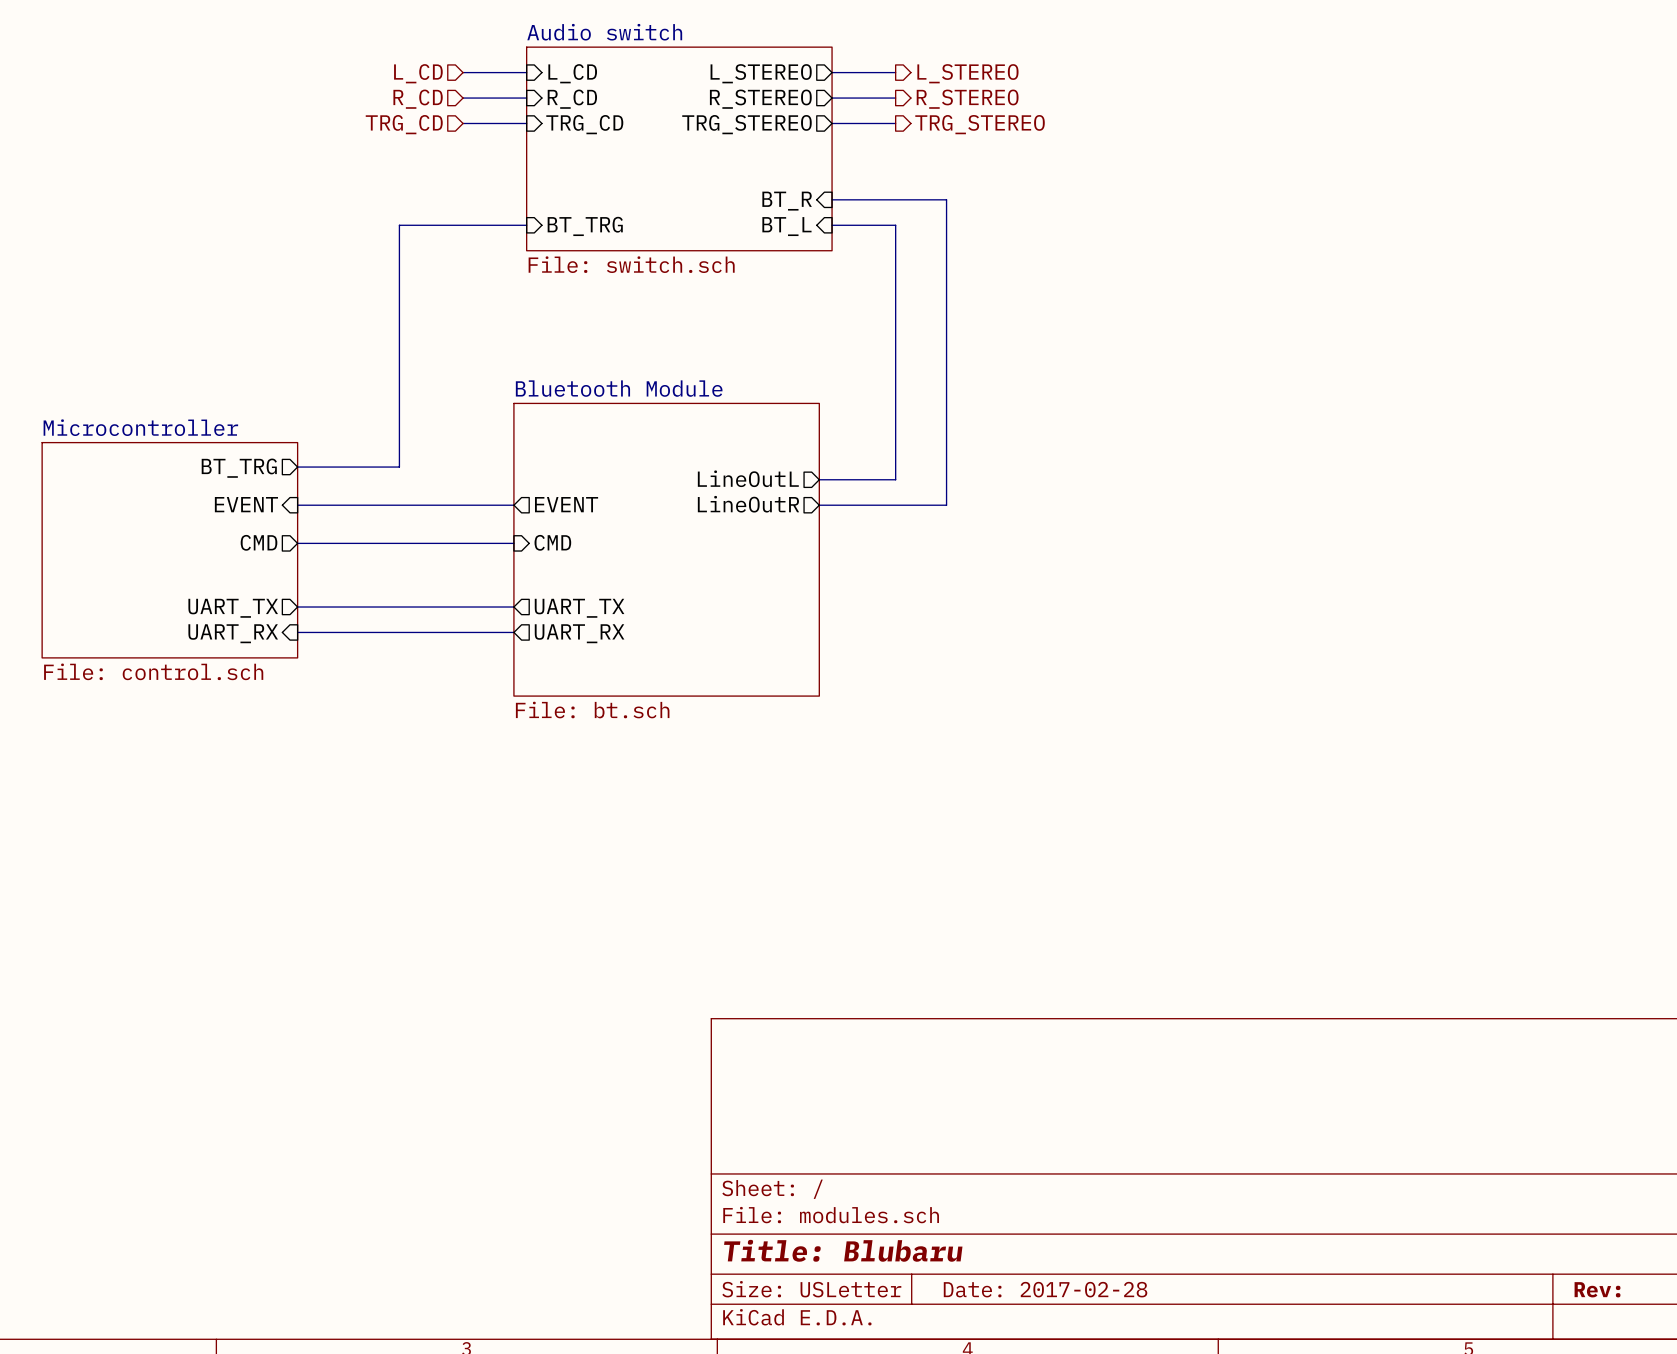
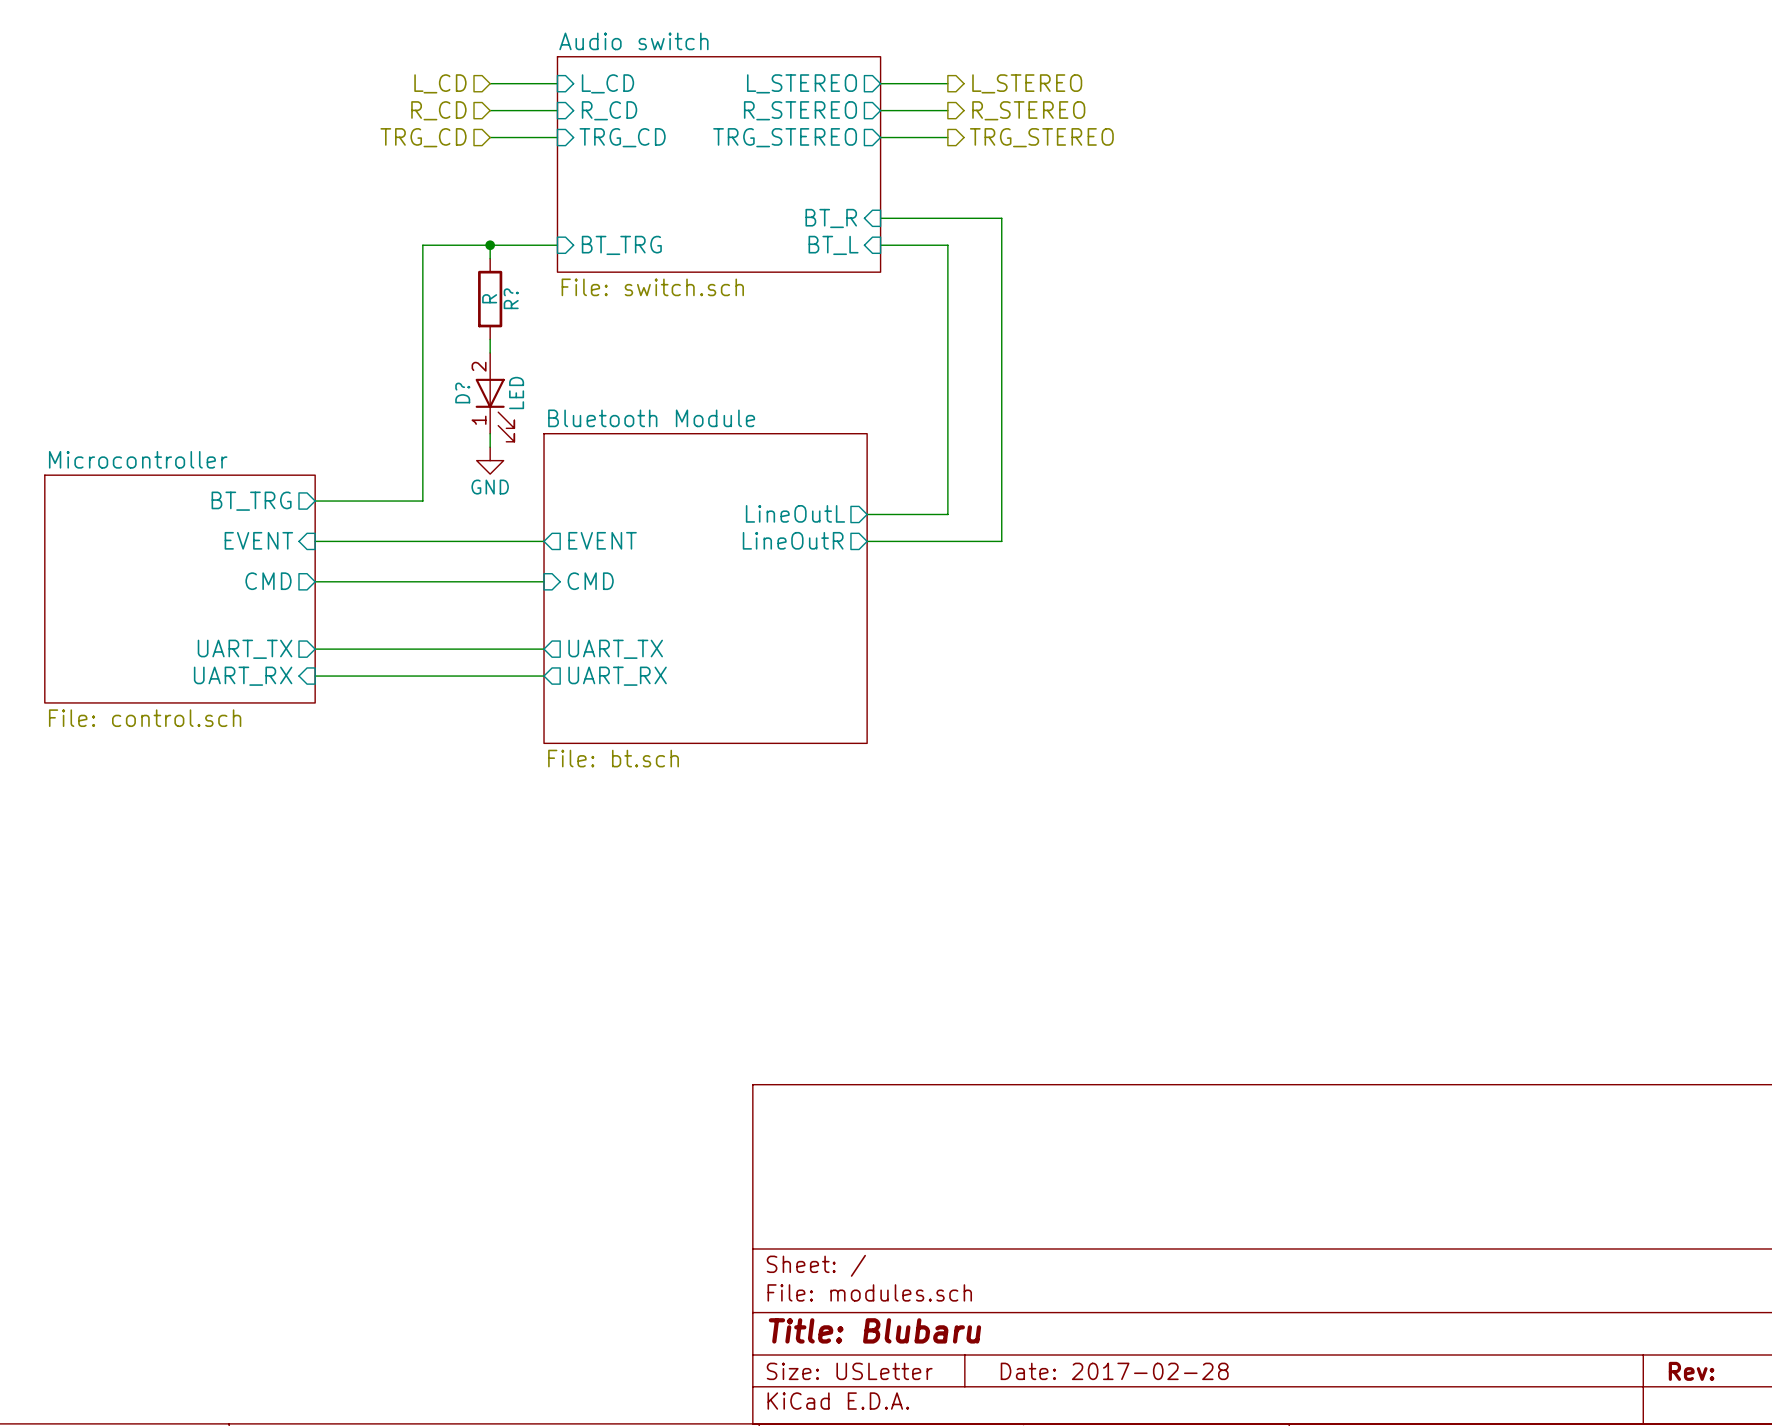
wire: none -> (490, 245) (490, 258)
junction: none -> (490, 245)
R?: none -> R (490, 299)
wire: none -> (490, 339) (490, 352)
D?: none -> LED (495, 397)
wire: none -> (490, 433) (490, 447)
power symbol: none -> GND (490, 460)

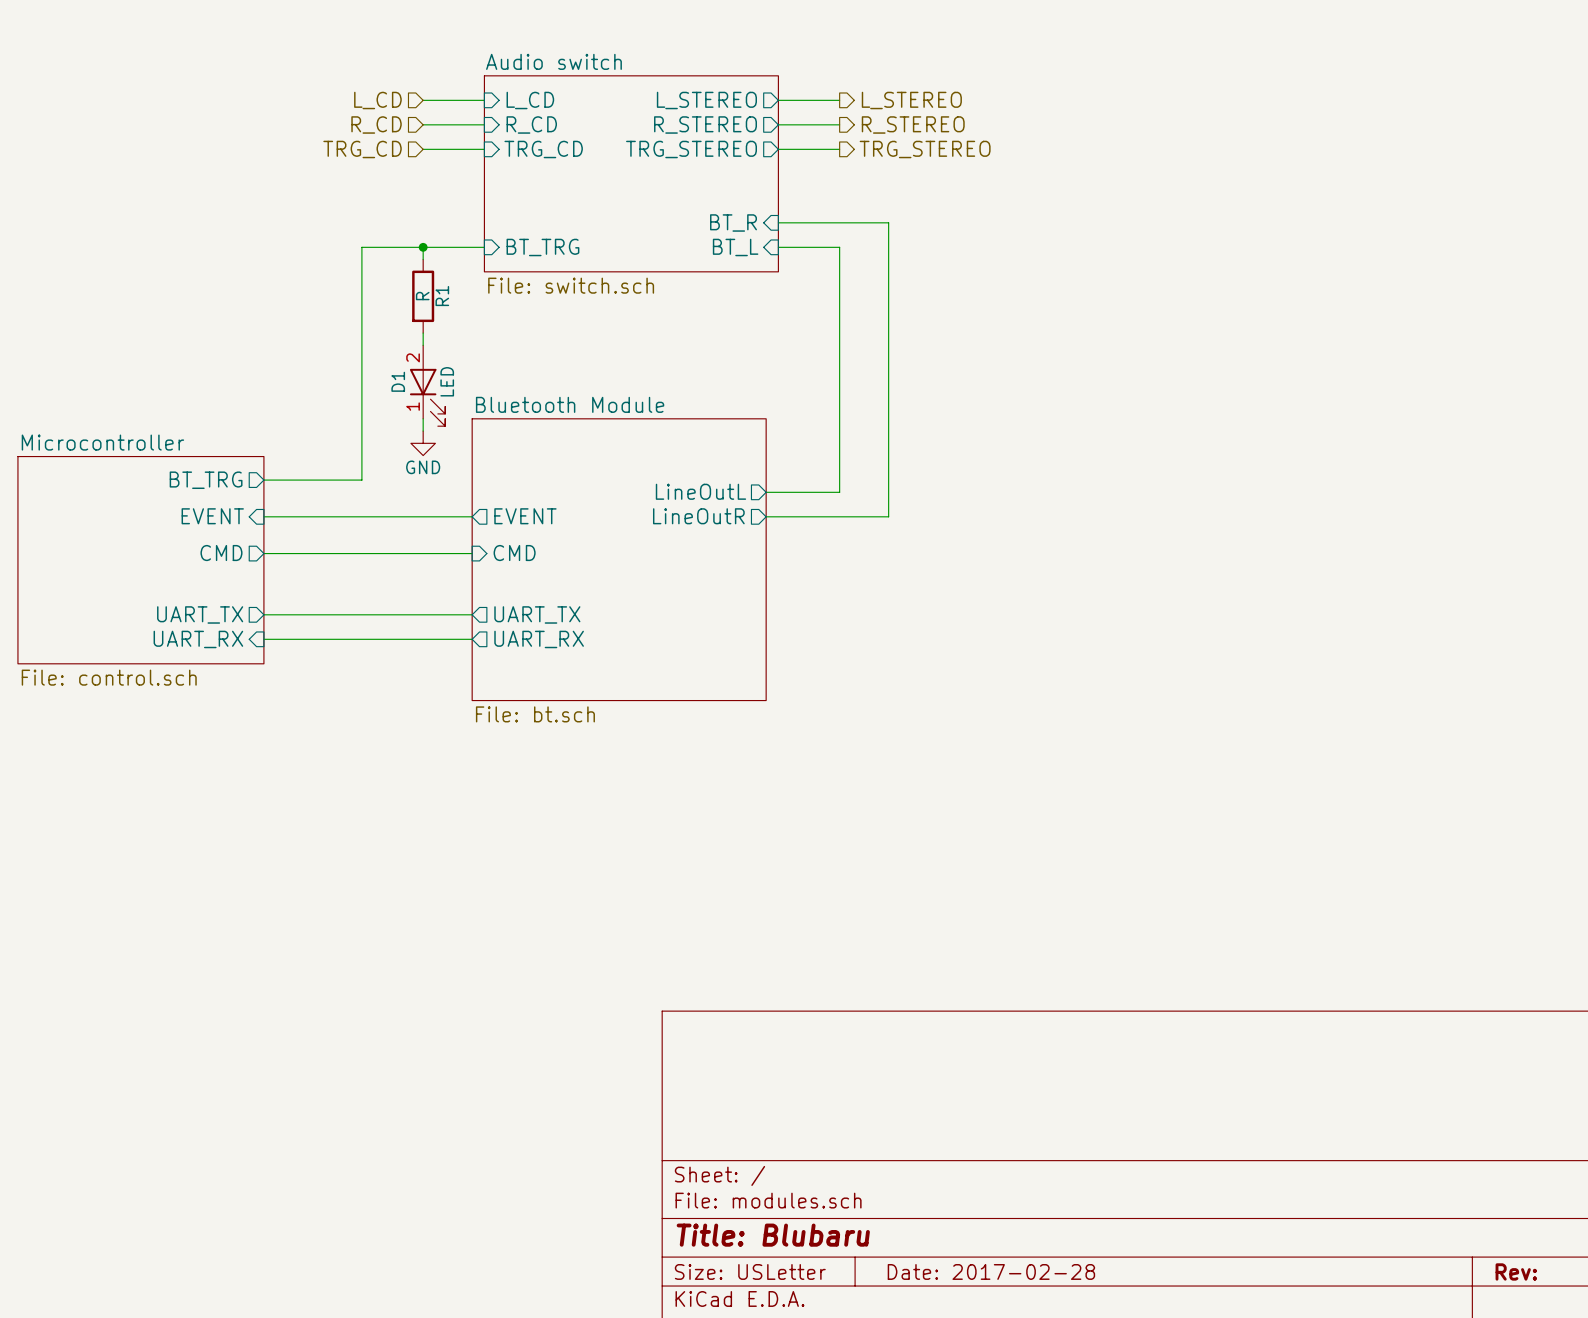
R? name: R? (511, 298) -> R1 (442, 296)
D? name: D? (462, 393) -> D1 (398, 381)

